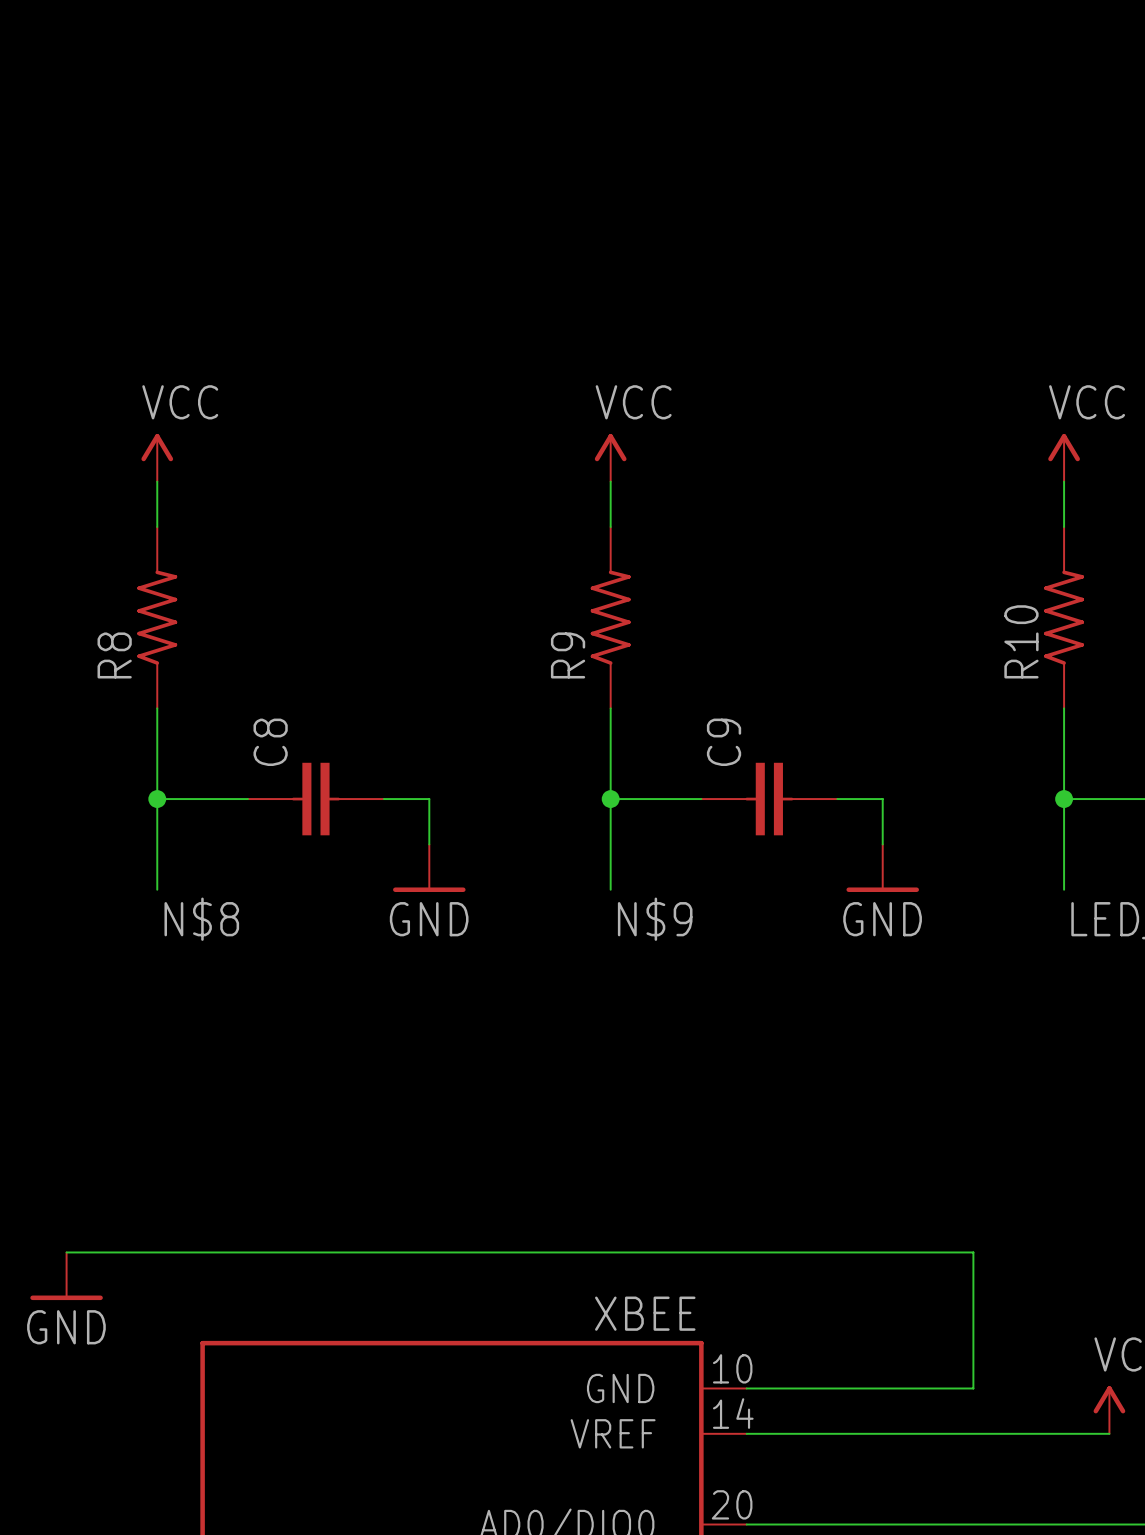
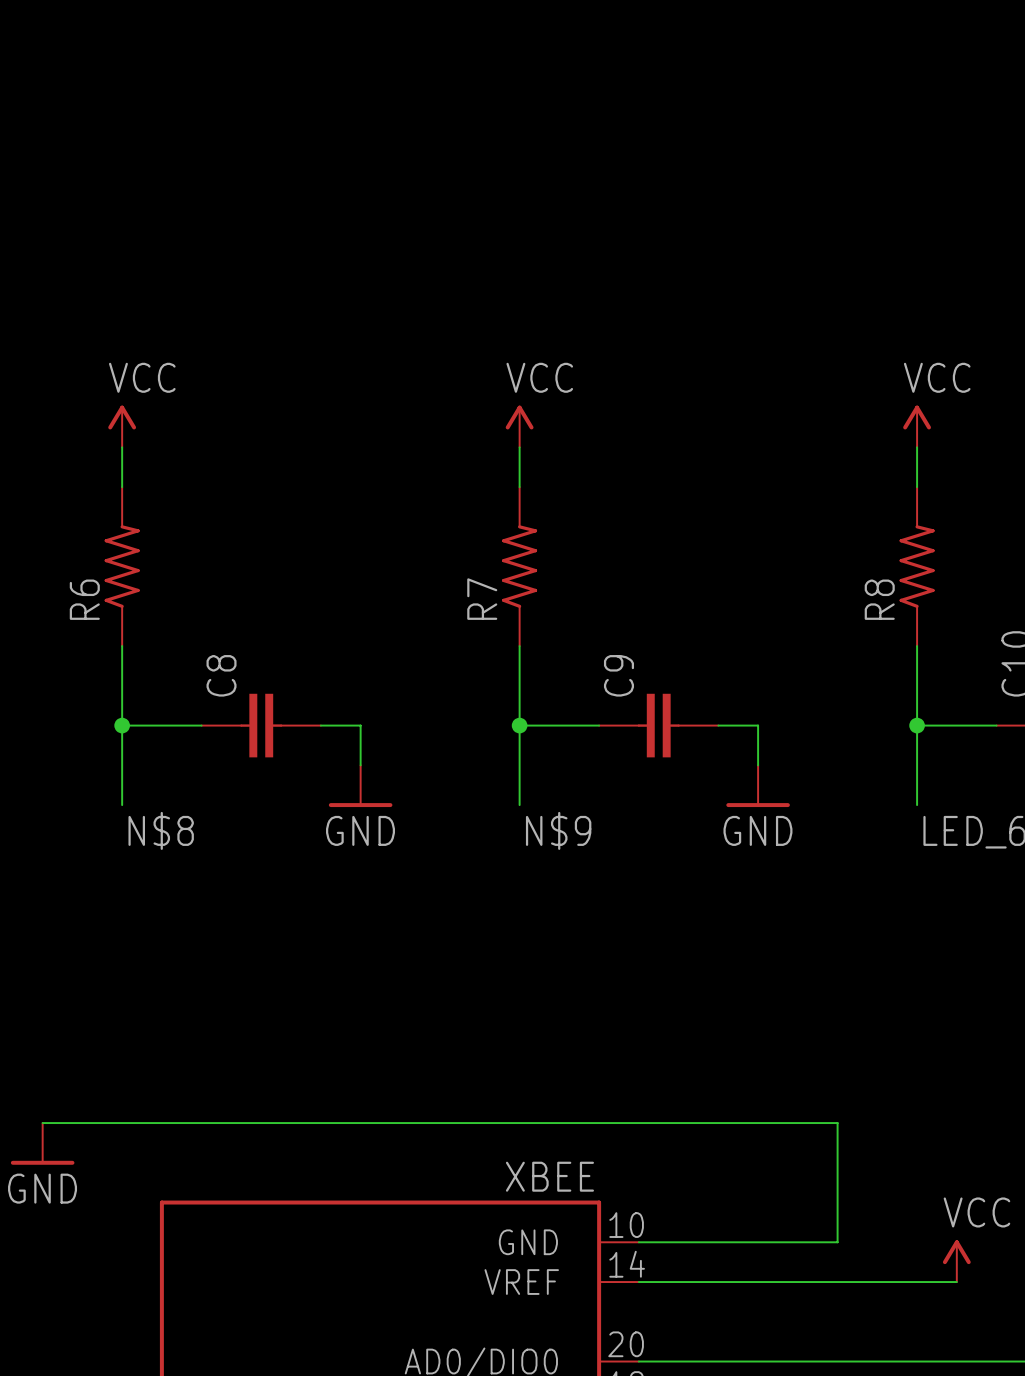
R10 name: R10 (1021, 641) -> R8 (879, 599)
R8 name: R8 (114, 655) -> R6 (84, 599)
R9 name: R9 (568, 655) -> R7 (482, 599)

